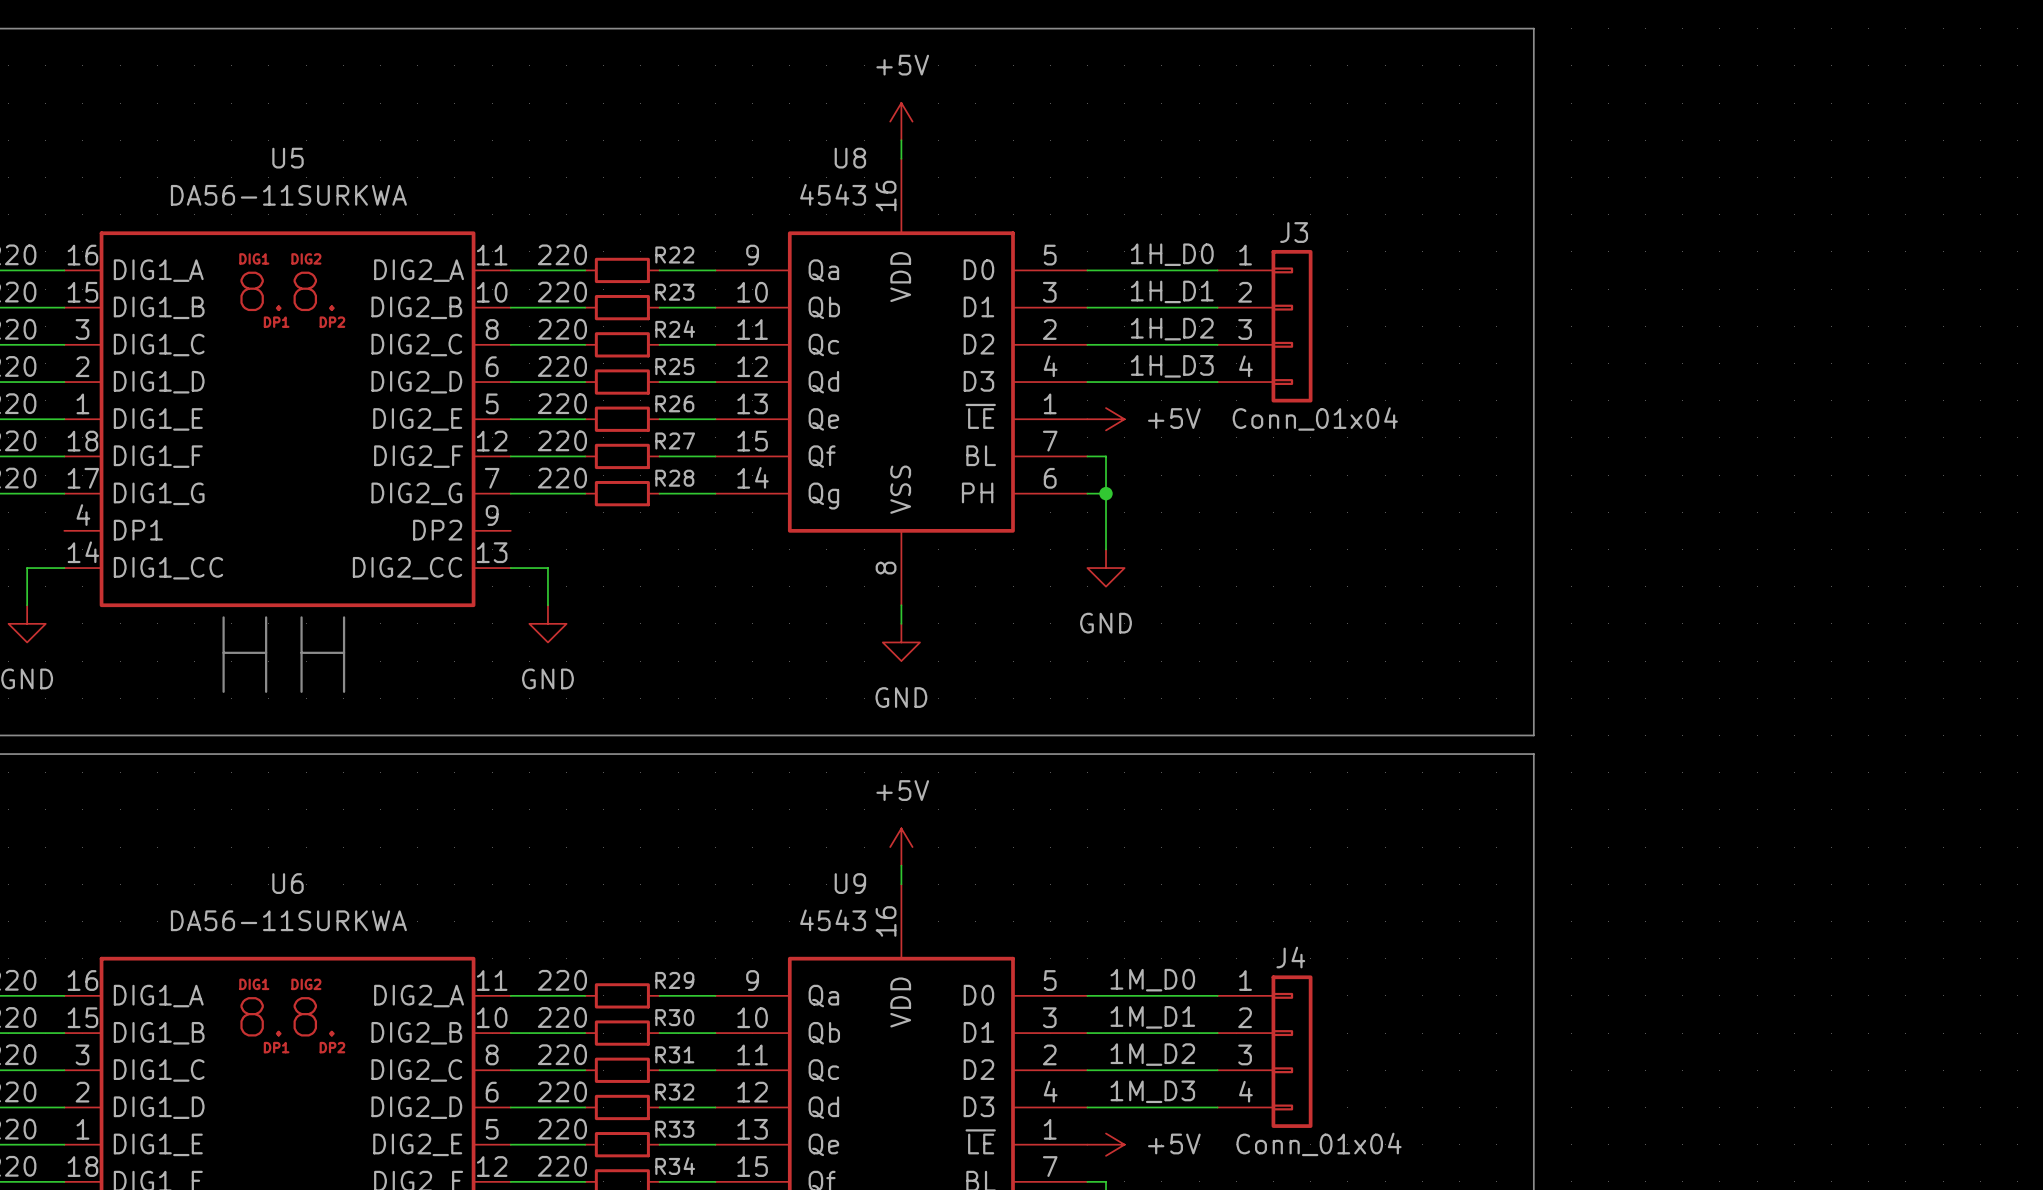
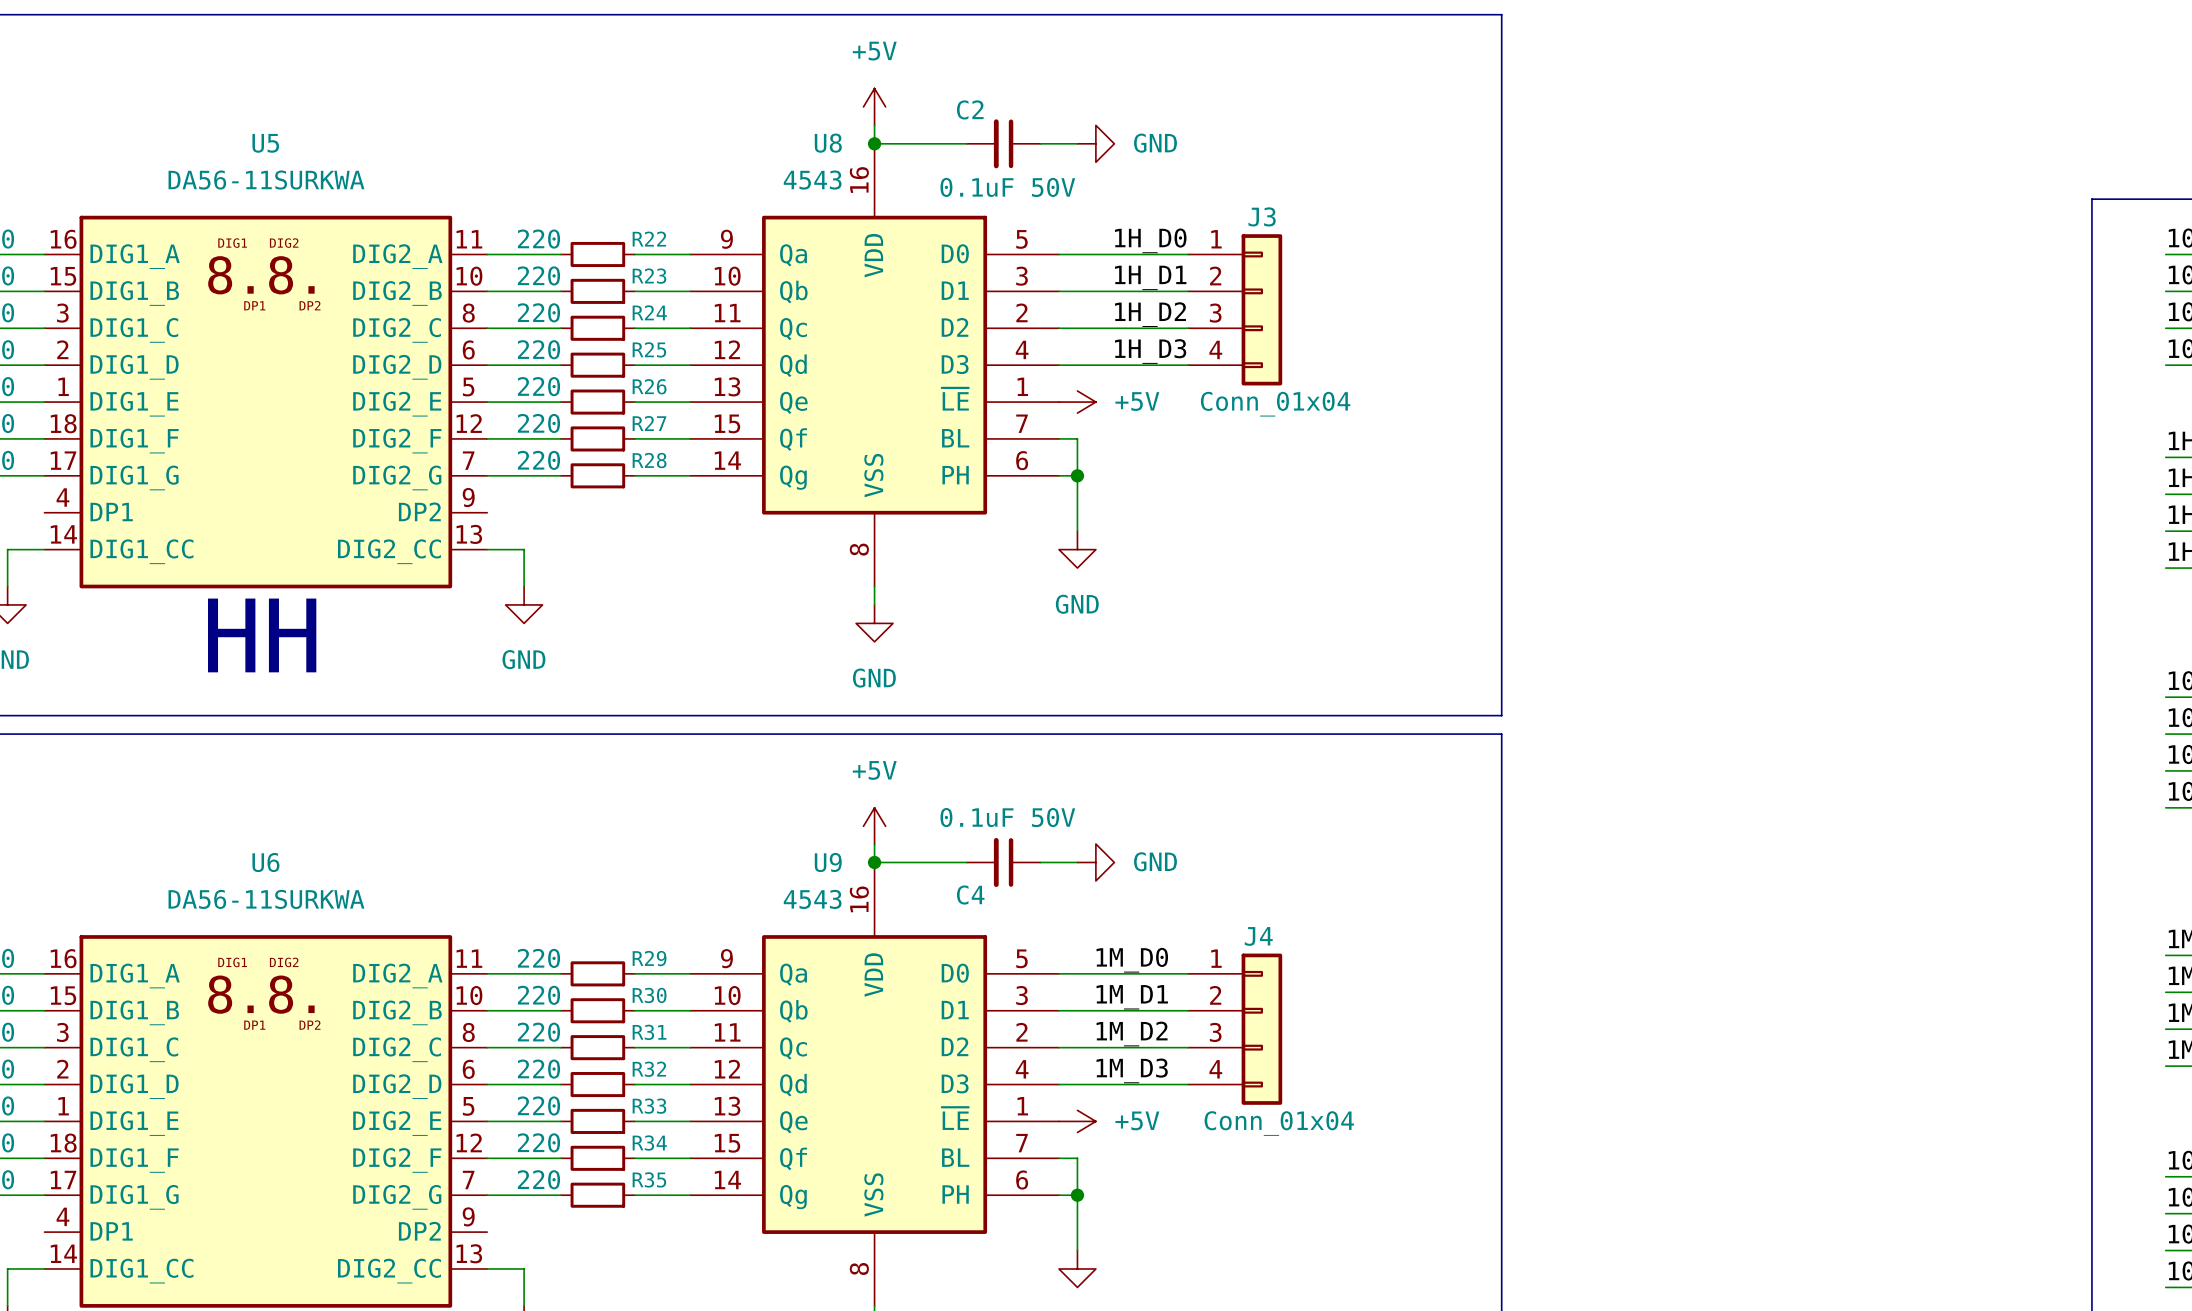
wire: none -> (874, 143) (966, 143)
junction: none -> (874, 143)
C2: none -> 0.1uF 50V (1003, 143)
wire: none -> (1040, 143) (1077, 143)
power symbol: none -> GND (1095, 143)
wire: none -> (874, 862) (966, 862)
junction: none -> (874, 862)
C4: none -> 0.1uF 50V (1003, 862)
wire: none -> (1040, 862) (1077, 862)
power symbol: none -> GND (1095, 862)

